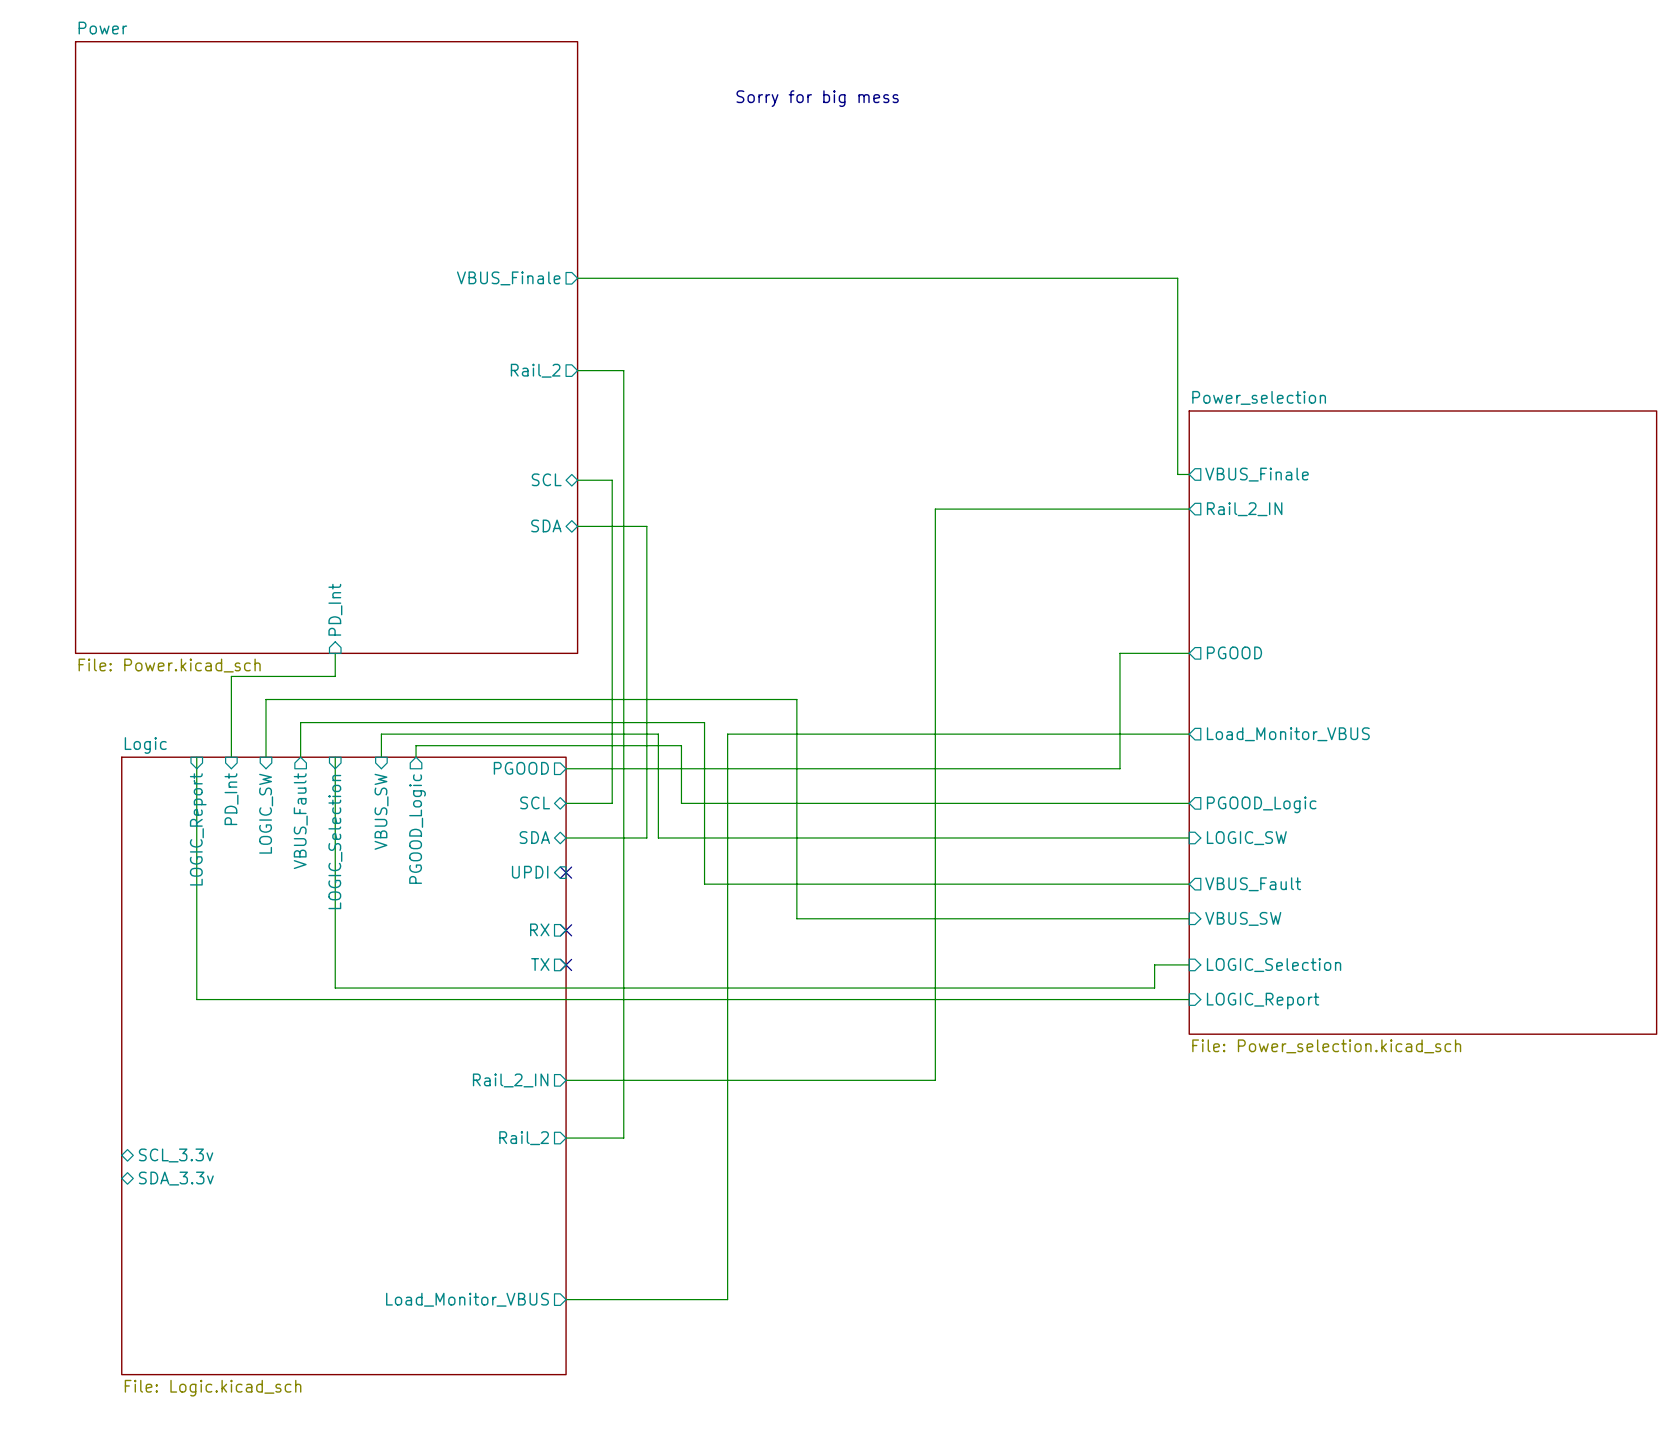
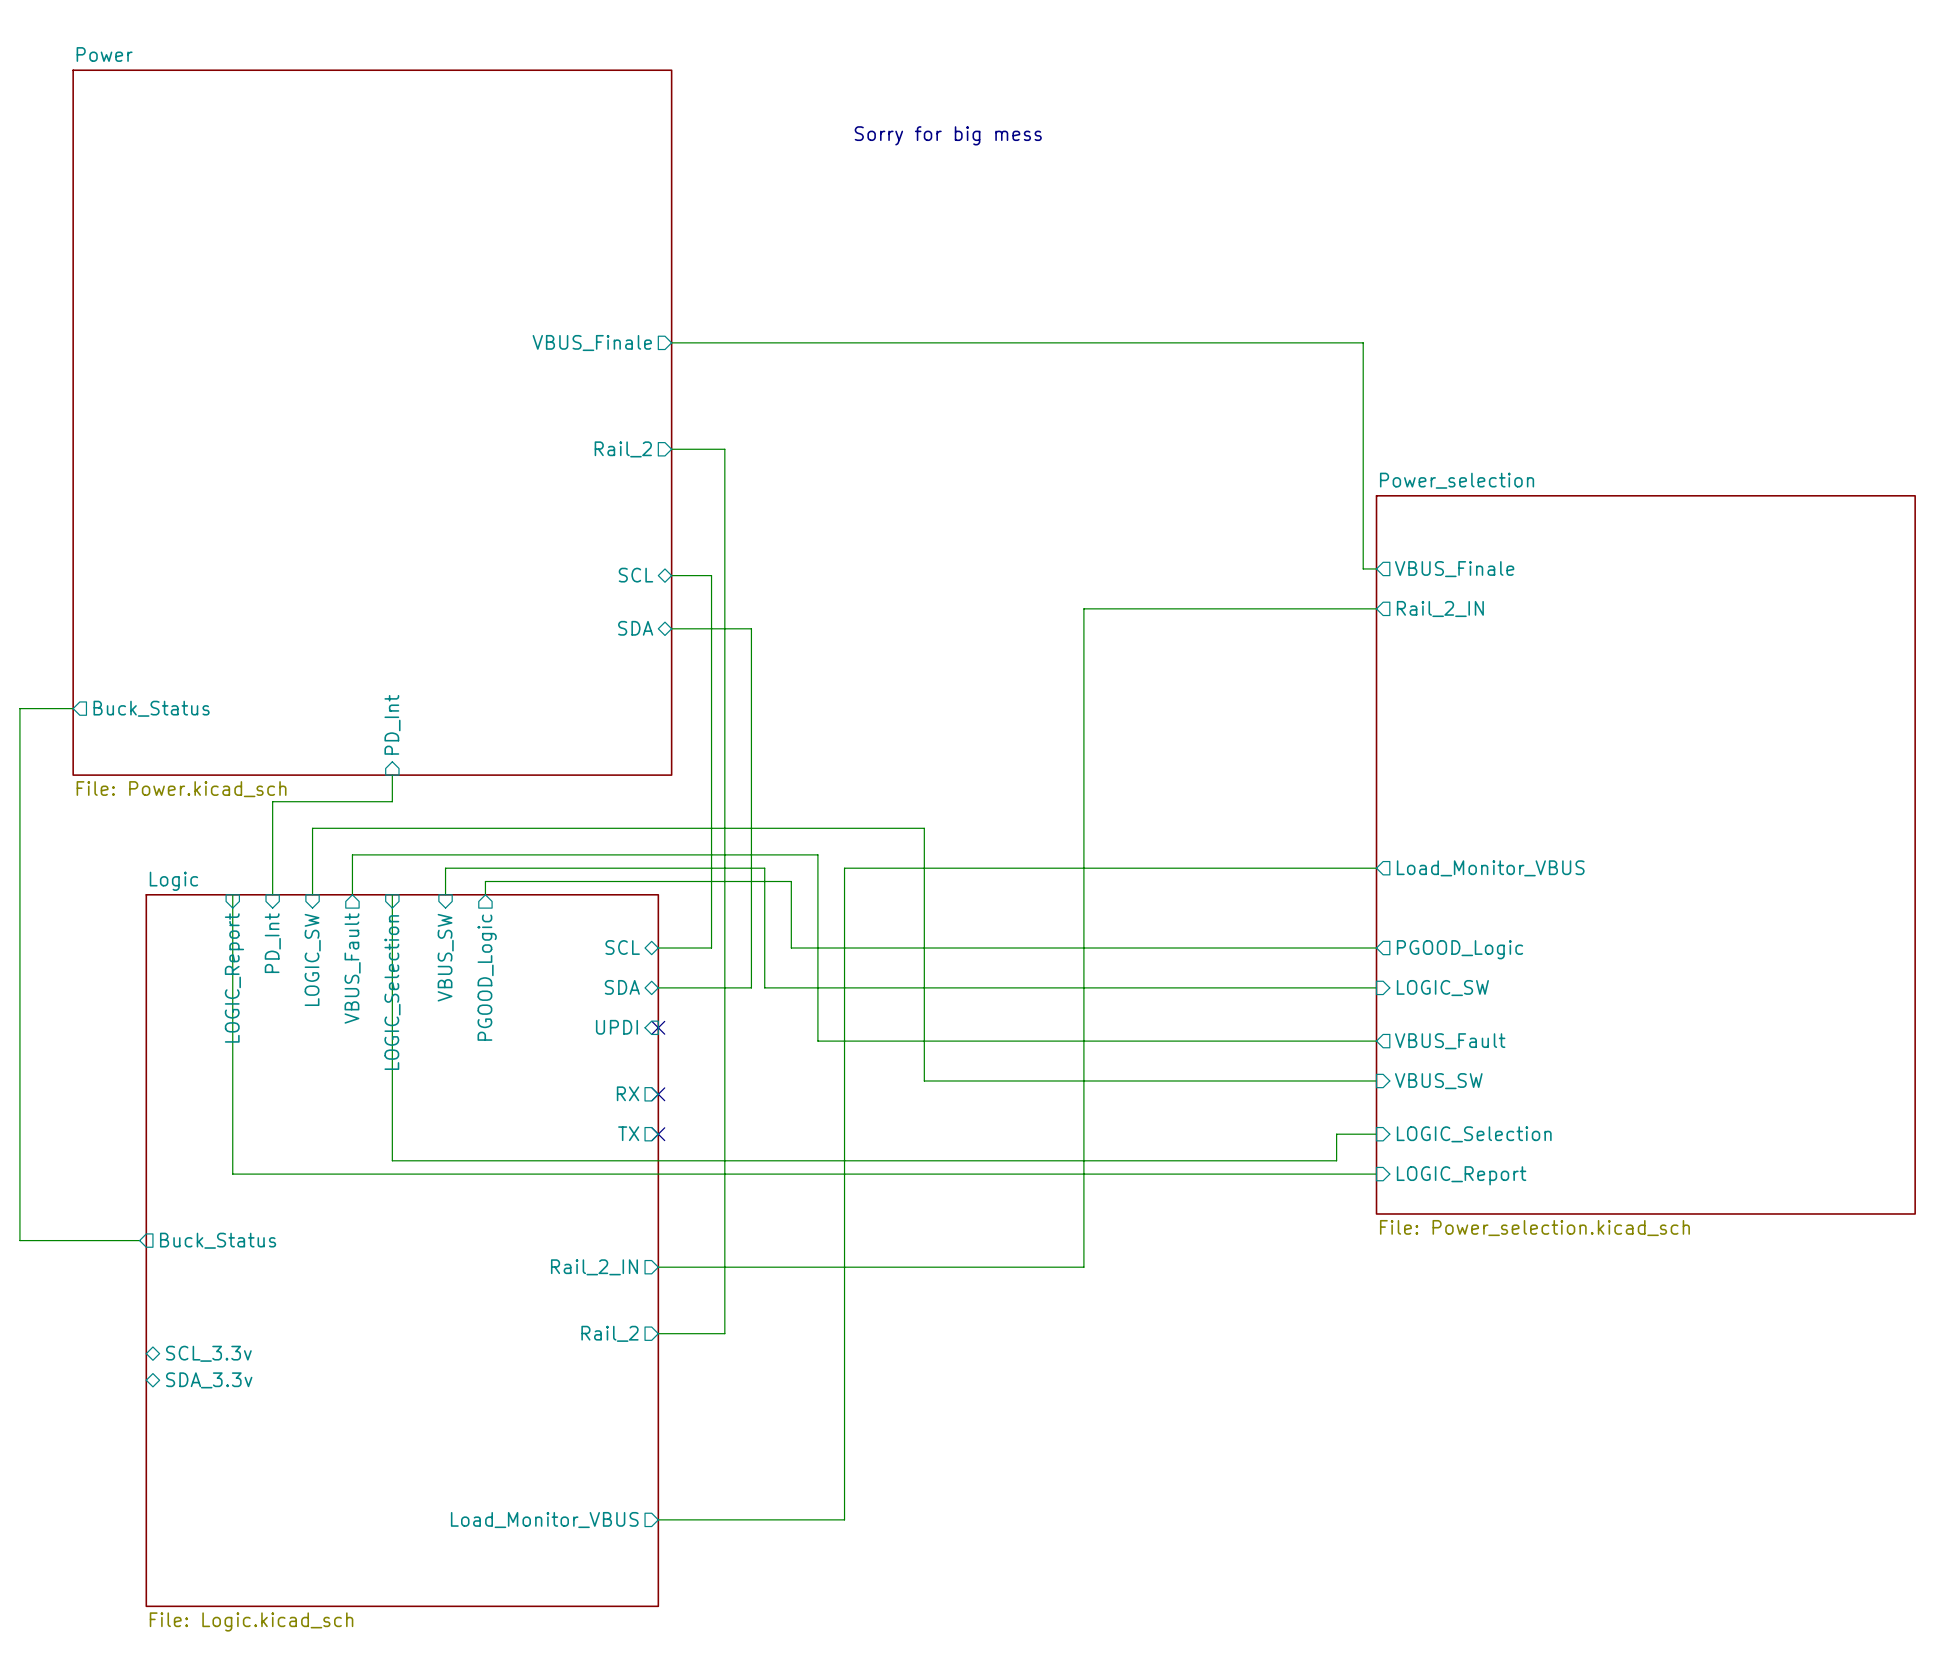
sheet Power shape: [74, 41, 579, 655] -> [72, 69, 673, 776]
wire: none -> (73, 708) (19, 708) (19, 1240) (139, 1240)
sheet pin: none -> Buck_Status (151, 708)
sheet pin: PGOOD (1234, 652) -> none
wire: (1189, 653) (1119, 653) (1119, 768) (566, 768) -> none
sheet pin: PGOOD (521, 768) -> none
sheet pin: none -> Buck_Status (218, 1240)

